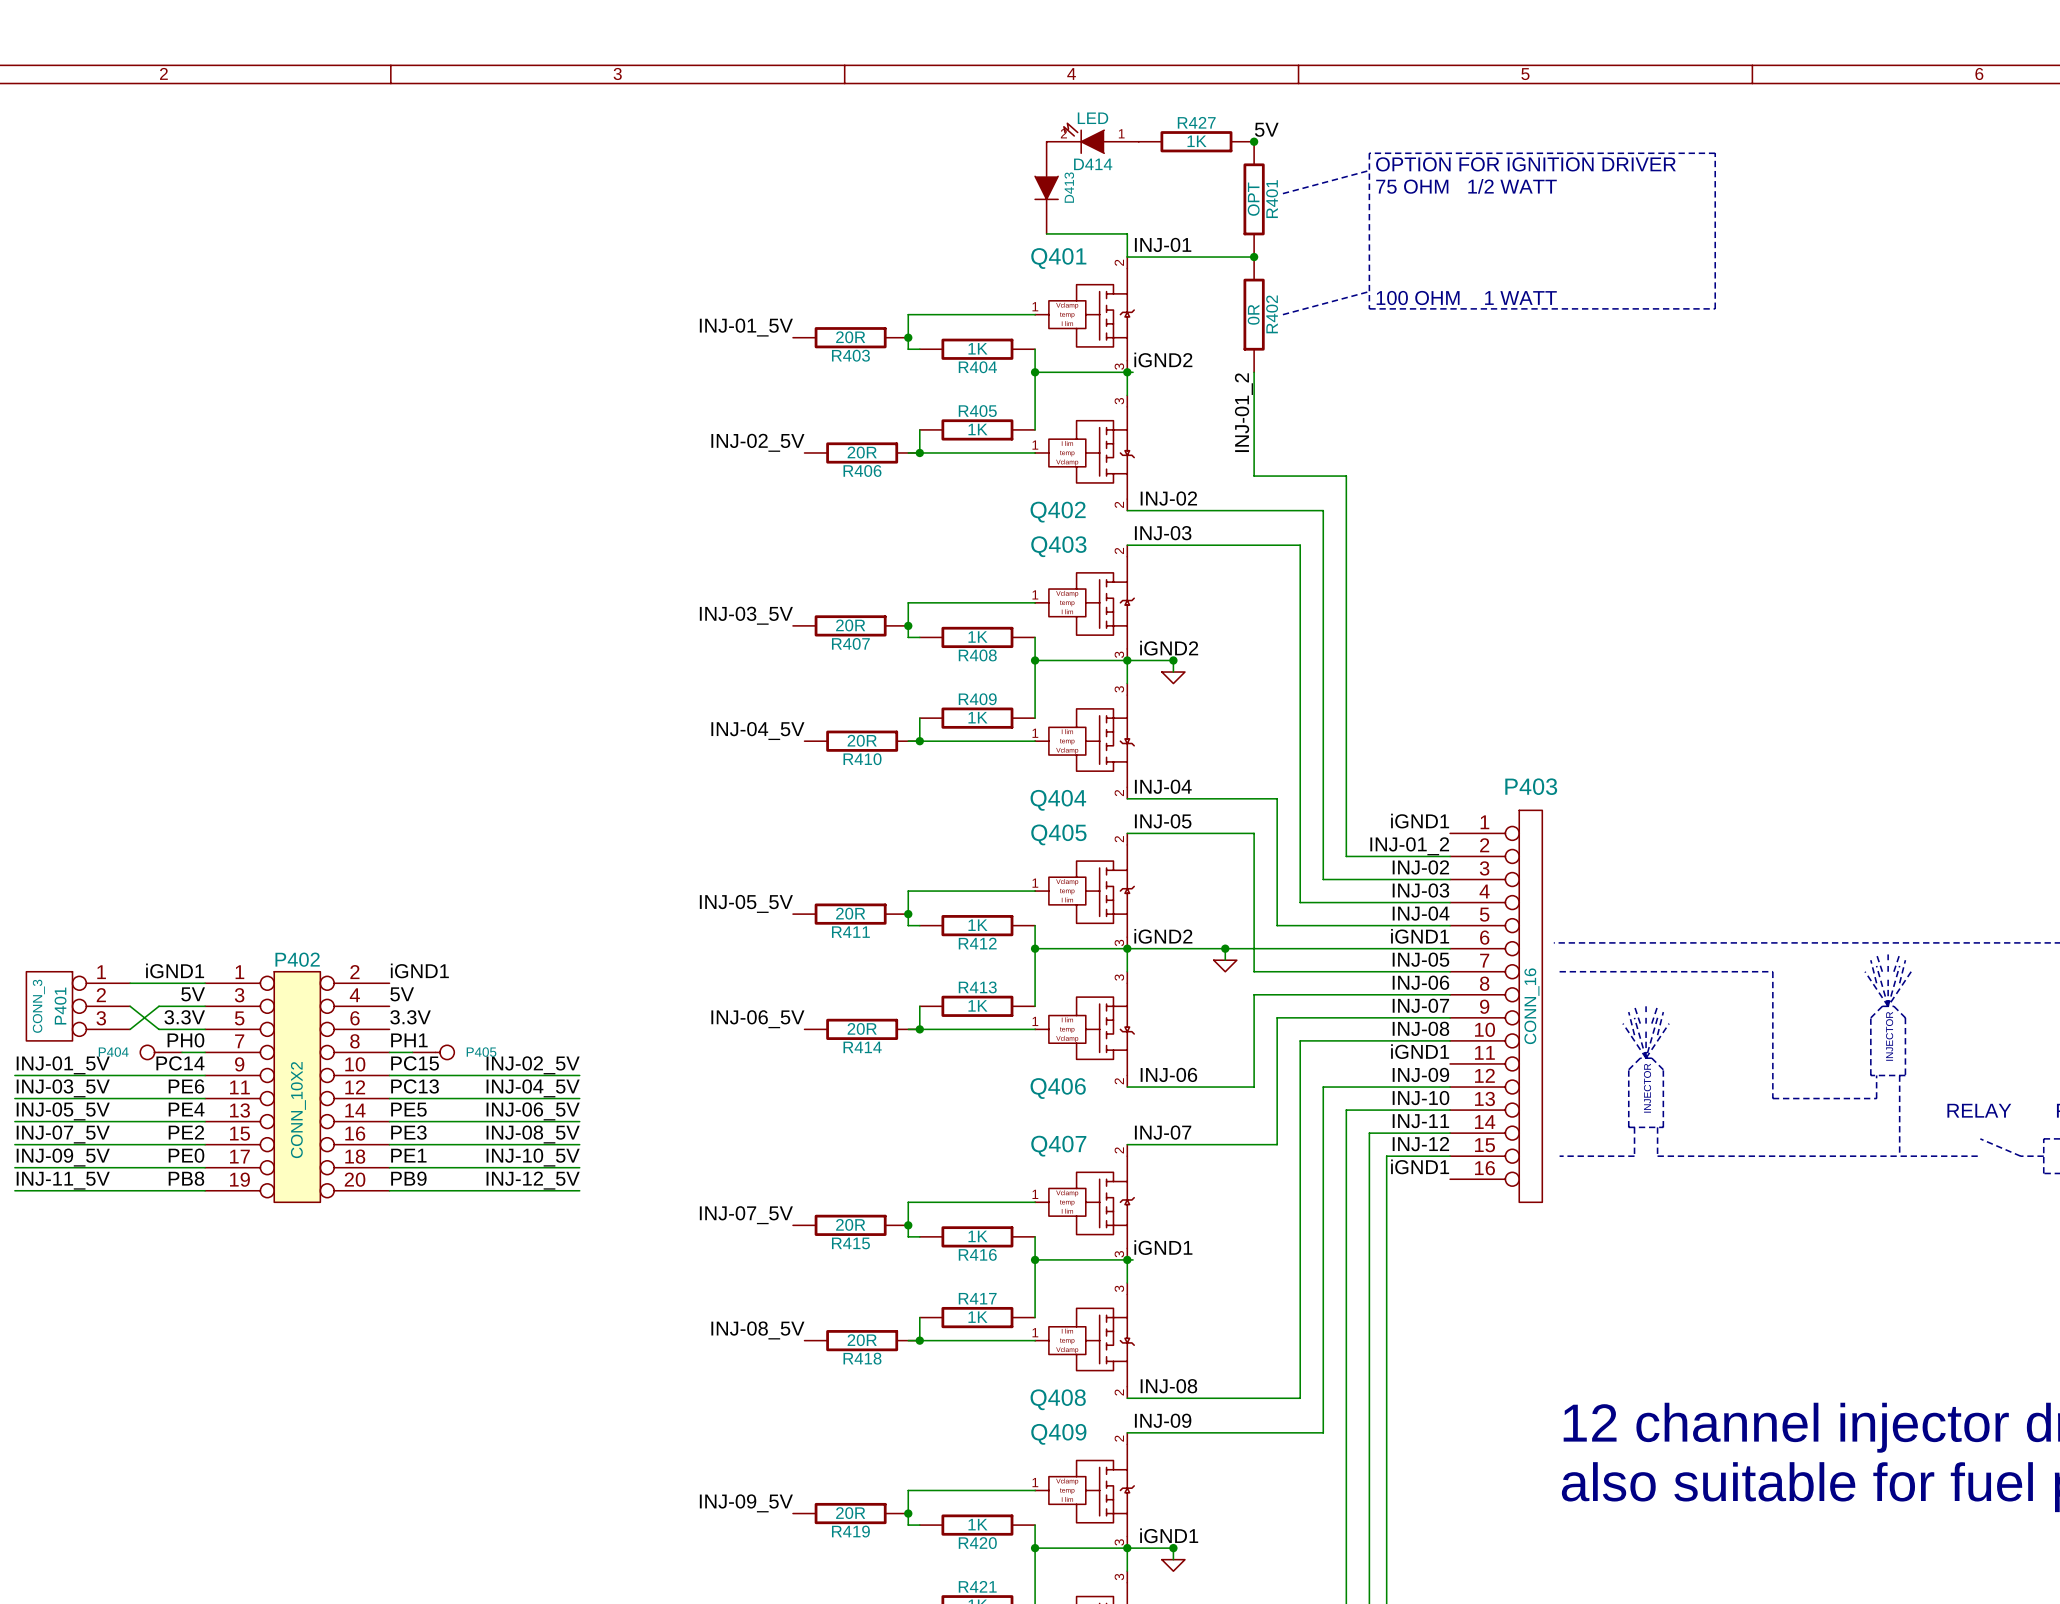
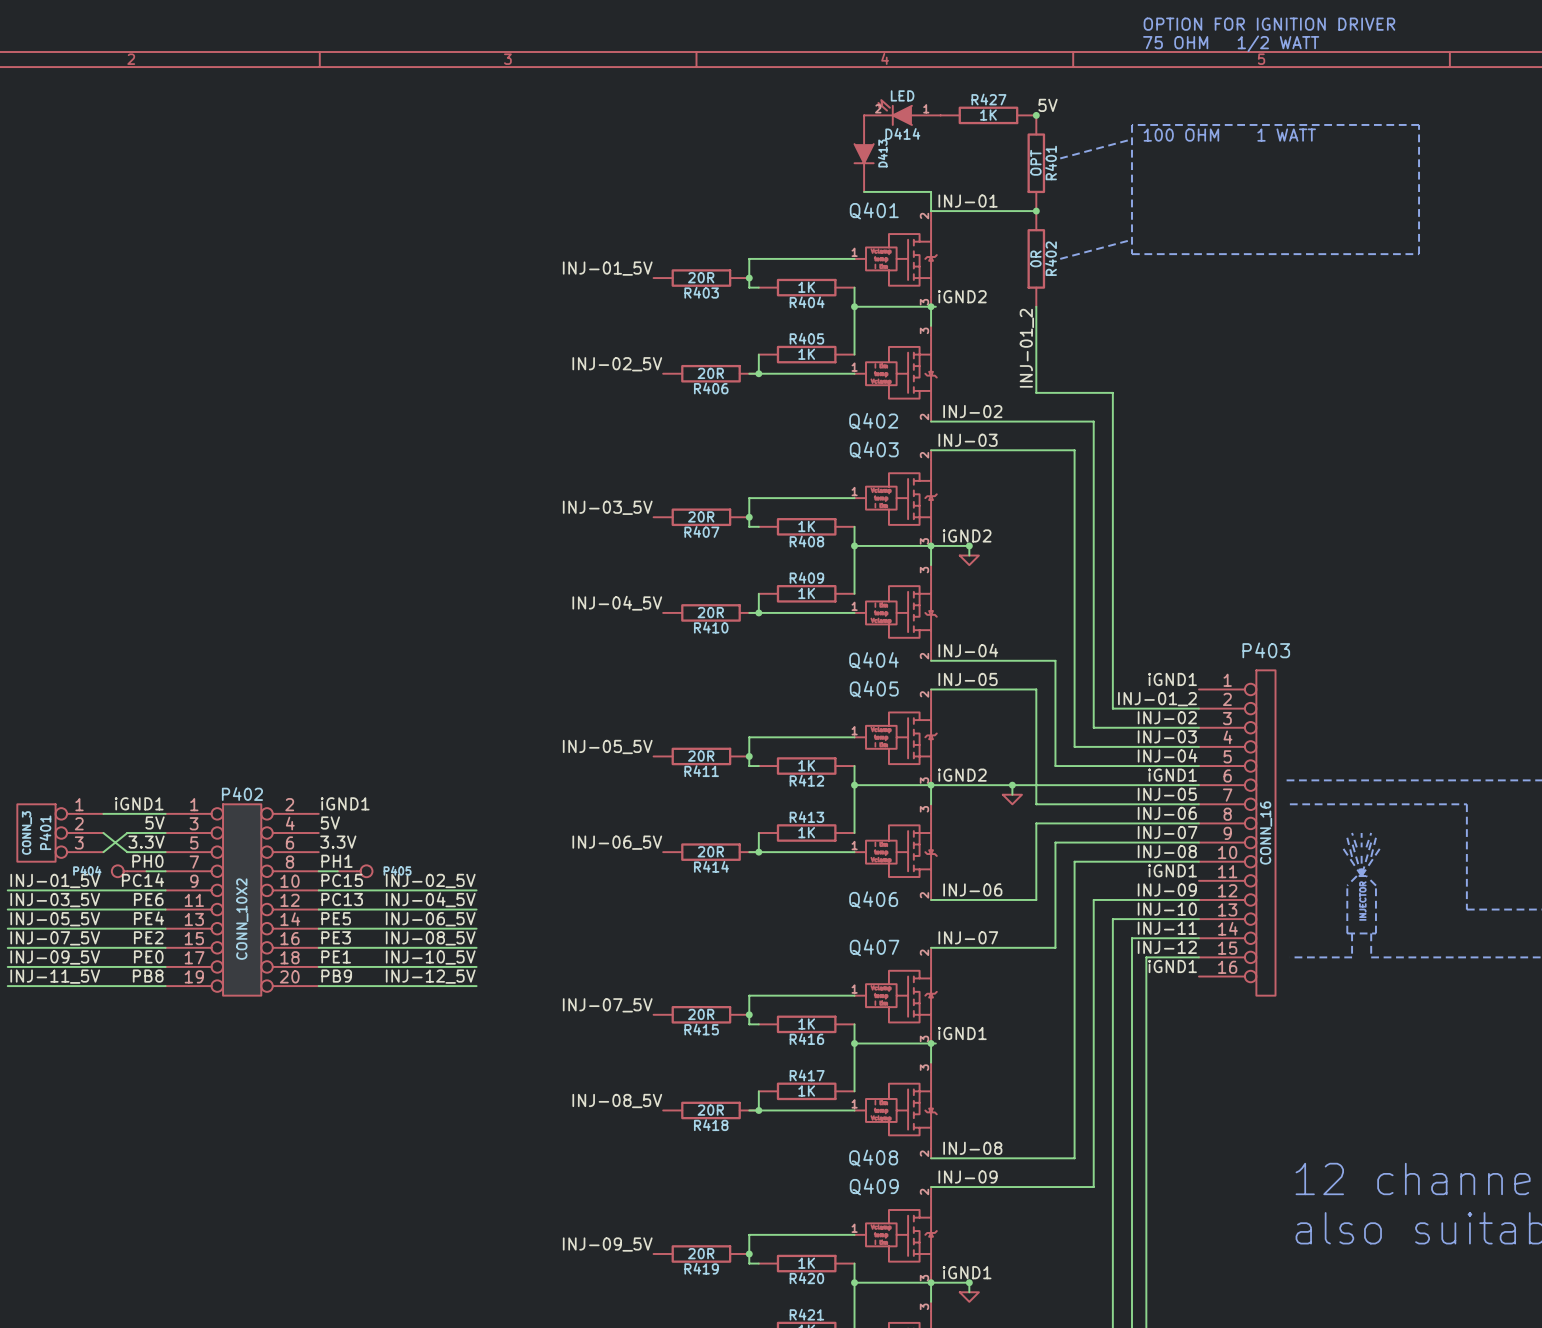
text position: OPTION FOR IGNITION DRIVER (1525, 164) -> OPTION FOR IGNITION DRIVER (1269, 24)
text position: 75 OHM 1/2 WATT (1466, 186) -> 75 OHM 1/2 WATT (1231, 43)
text position: 100 OHM 1 WATT (1466, 298) -> 100 OHM 1 WATT (1229, 135)

